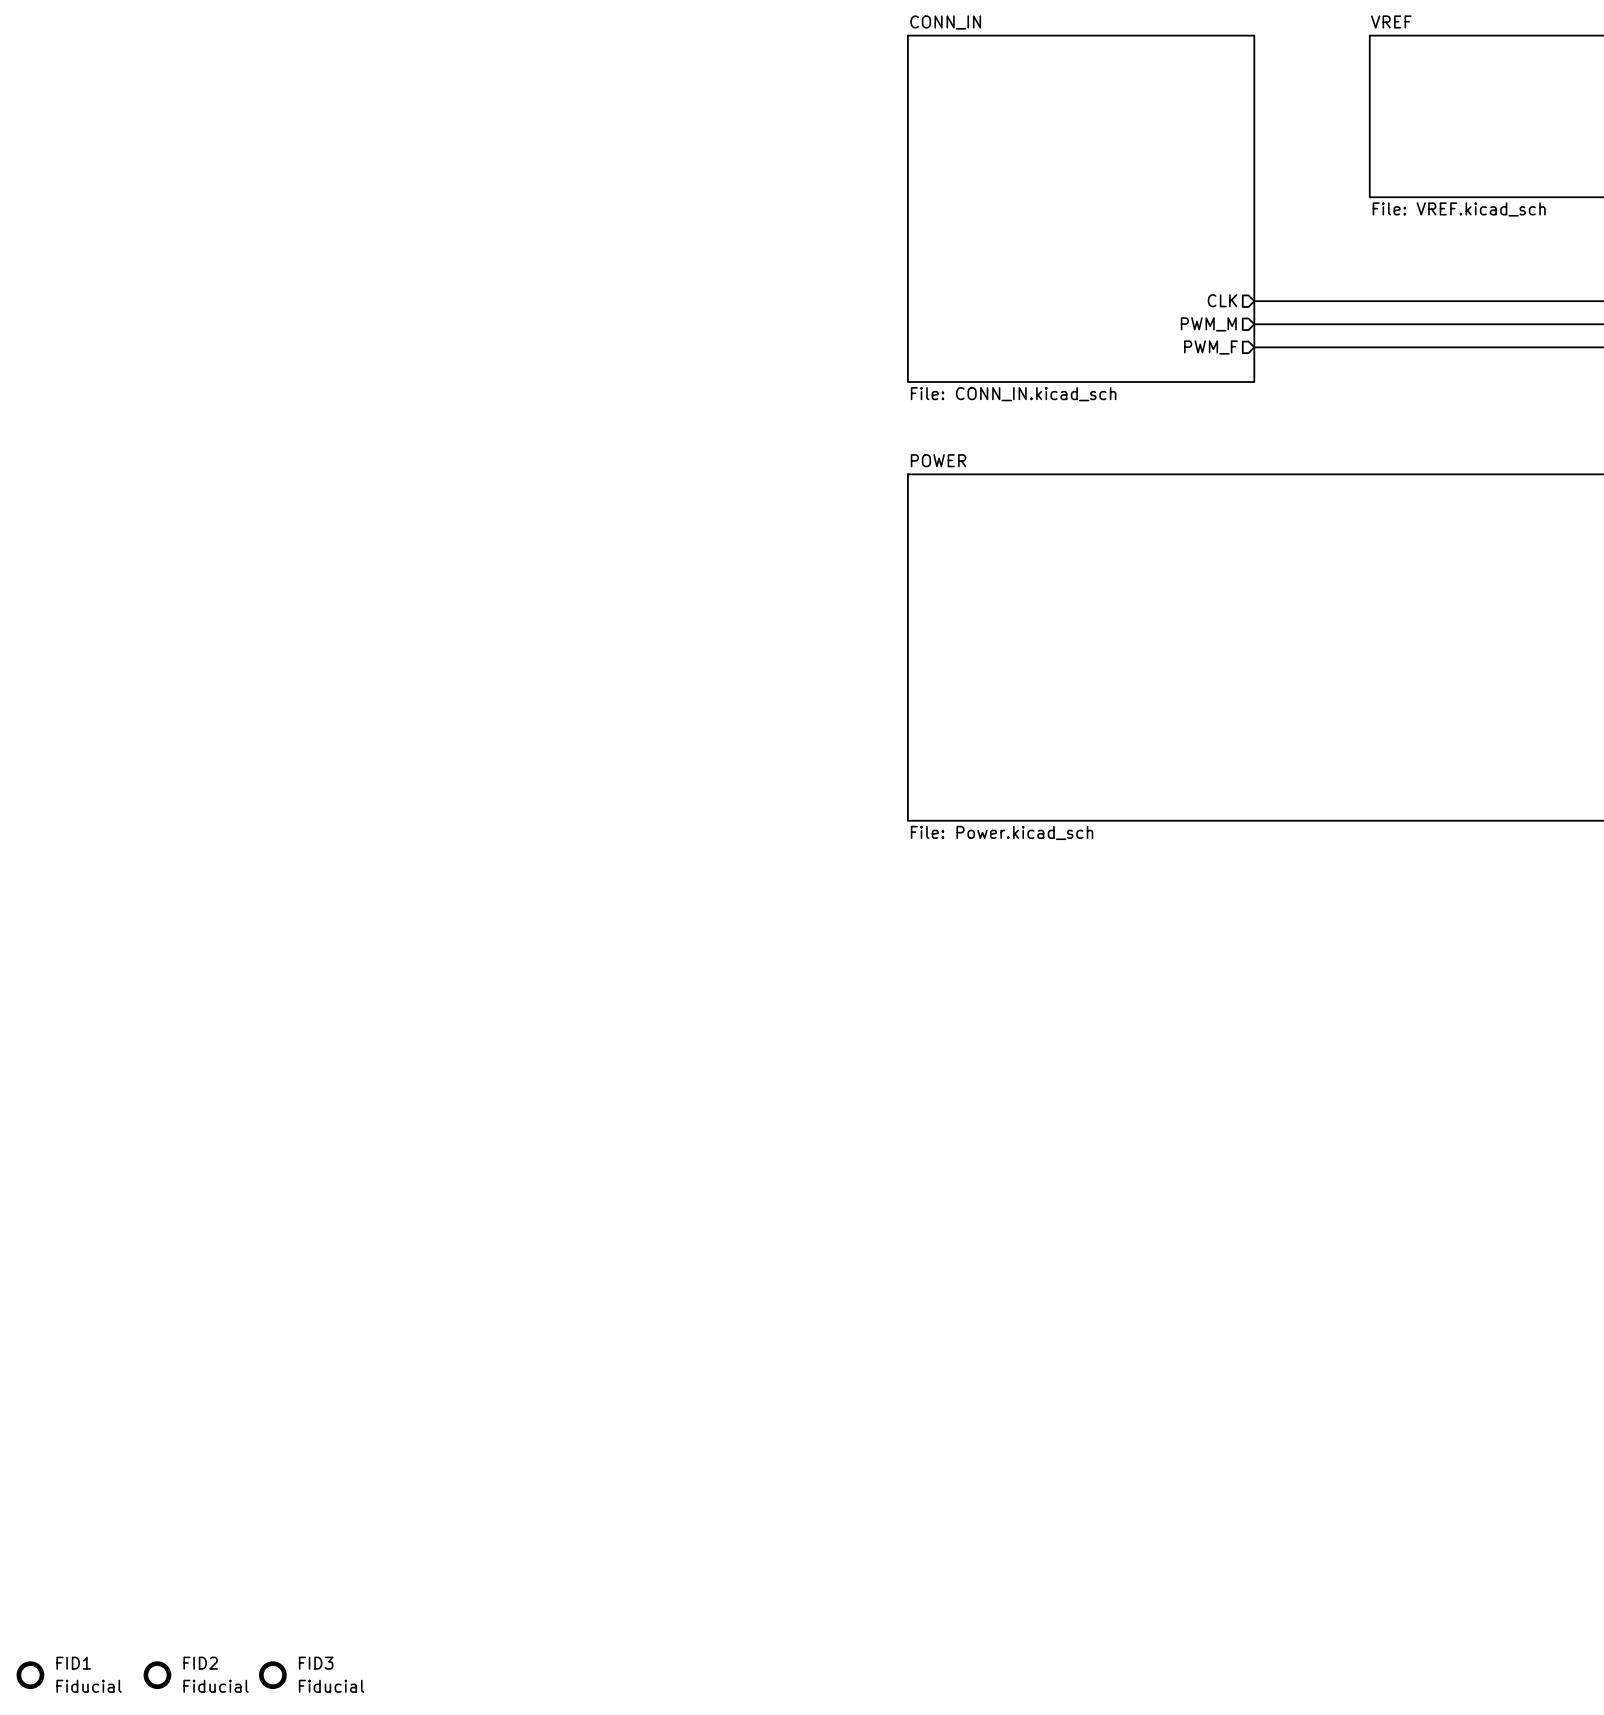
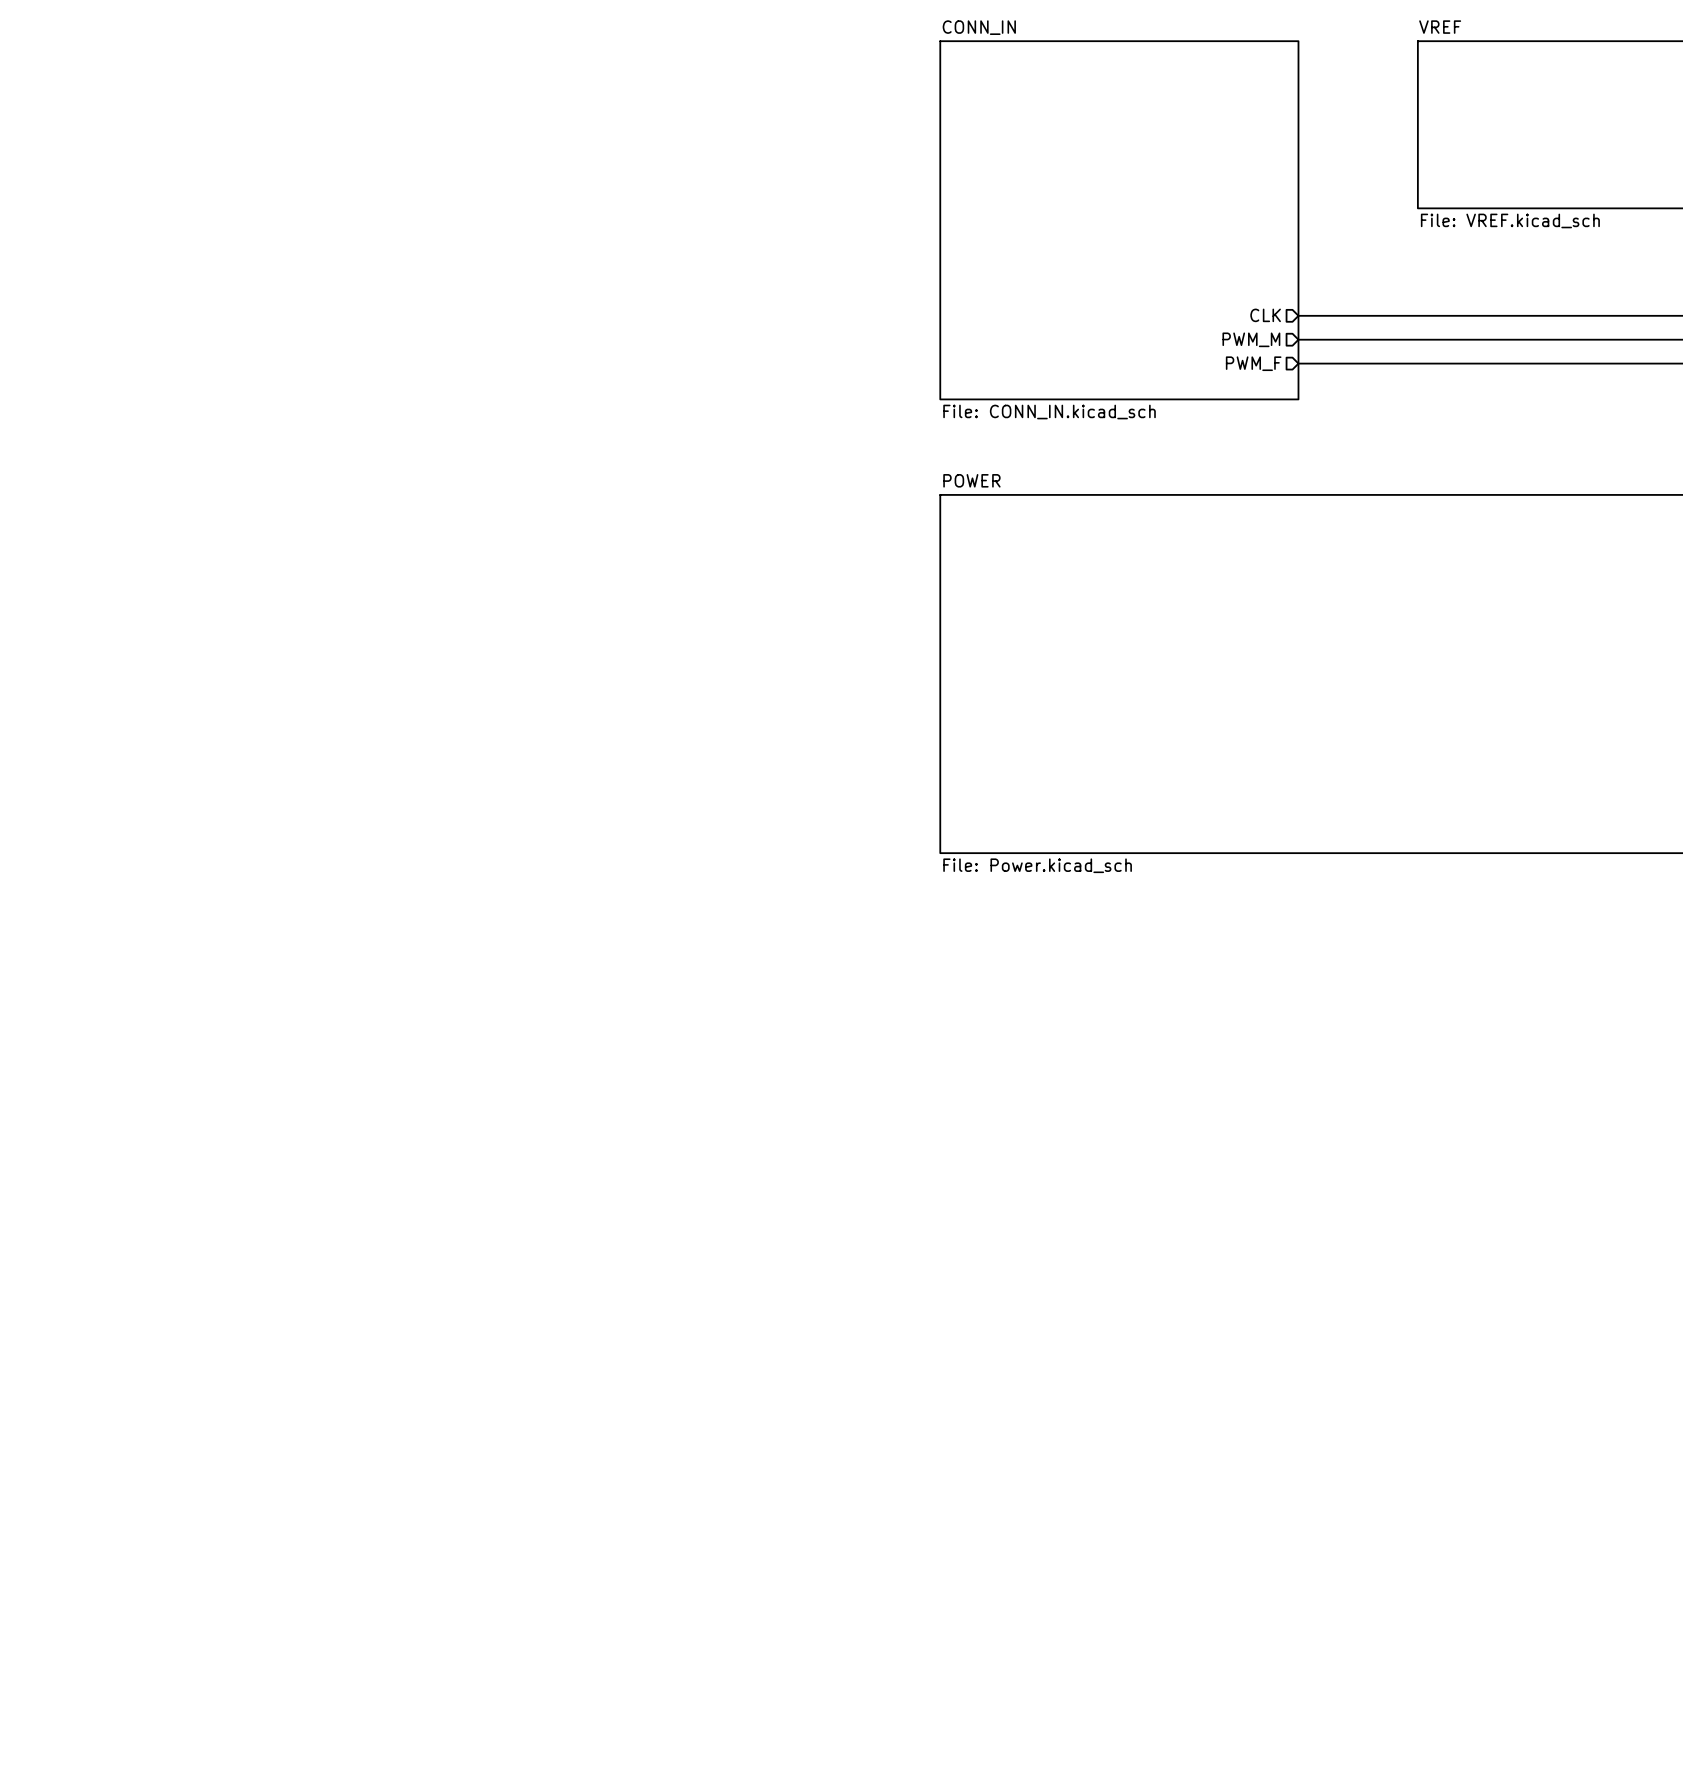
FID1: Fiducial (30, 1675) -> none
FID2: Fiducial (157, 1675) -> none
FID3: Fiducial (272, 1675) -> none

